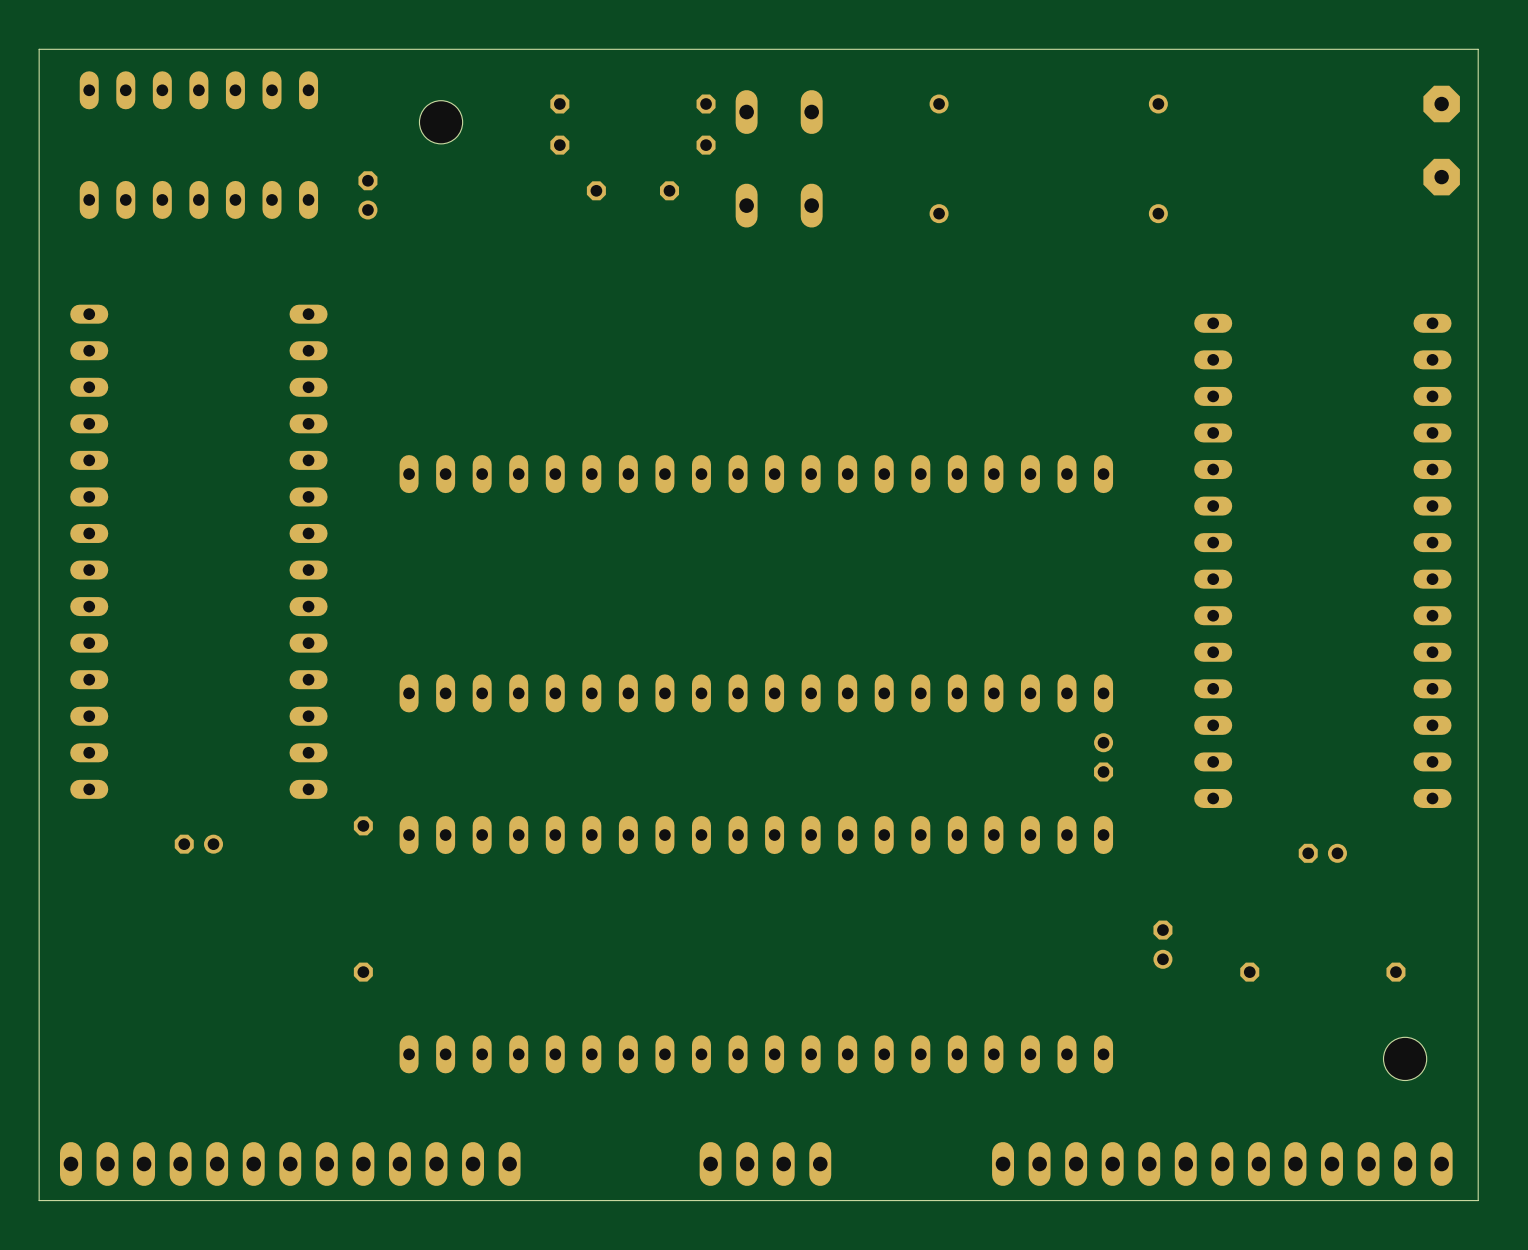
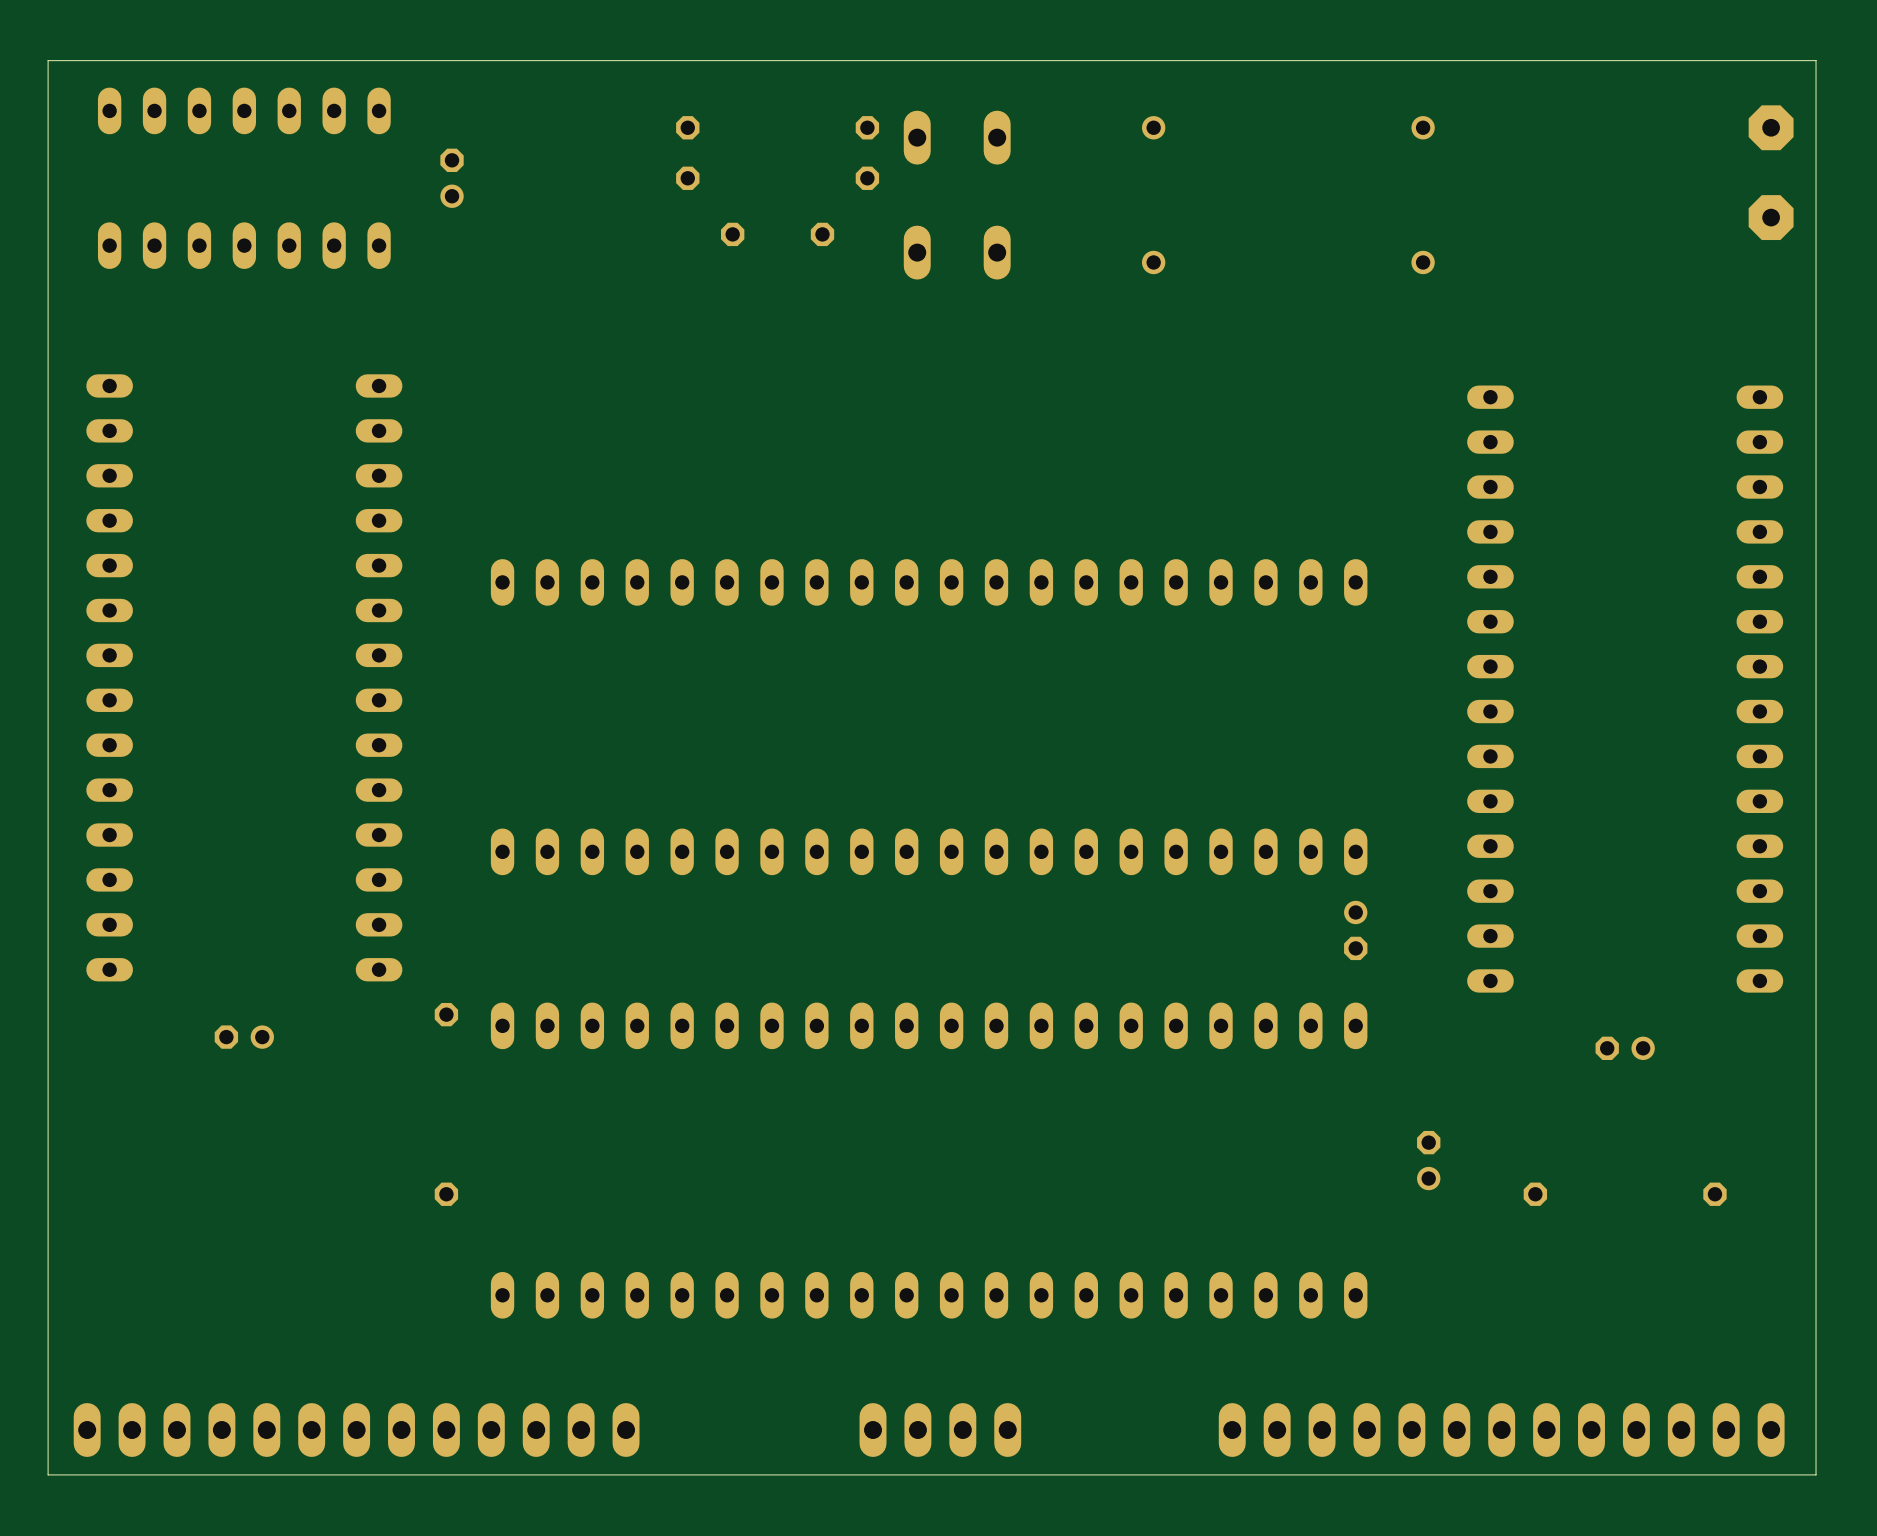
part: (441, 122) -> none
part position: (367, 195) -> (452, 178)
part: (1405, 1058) -> none

